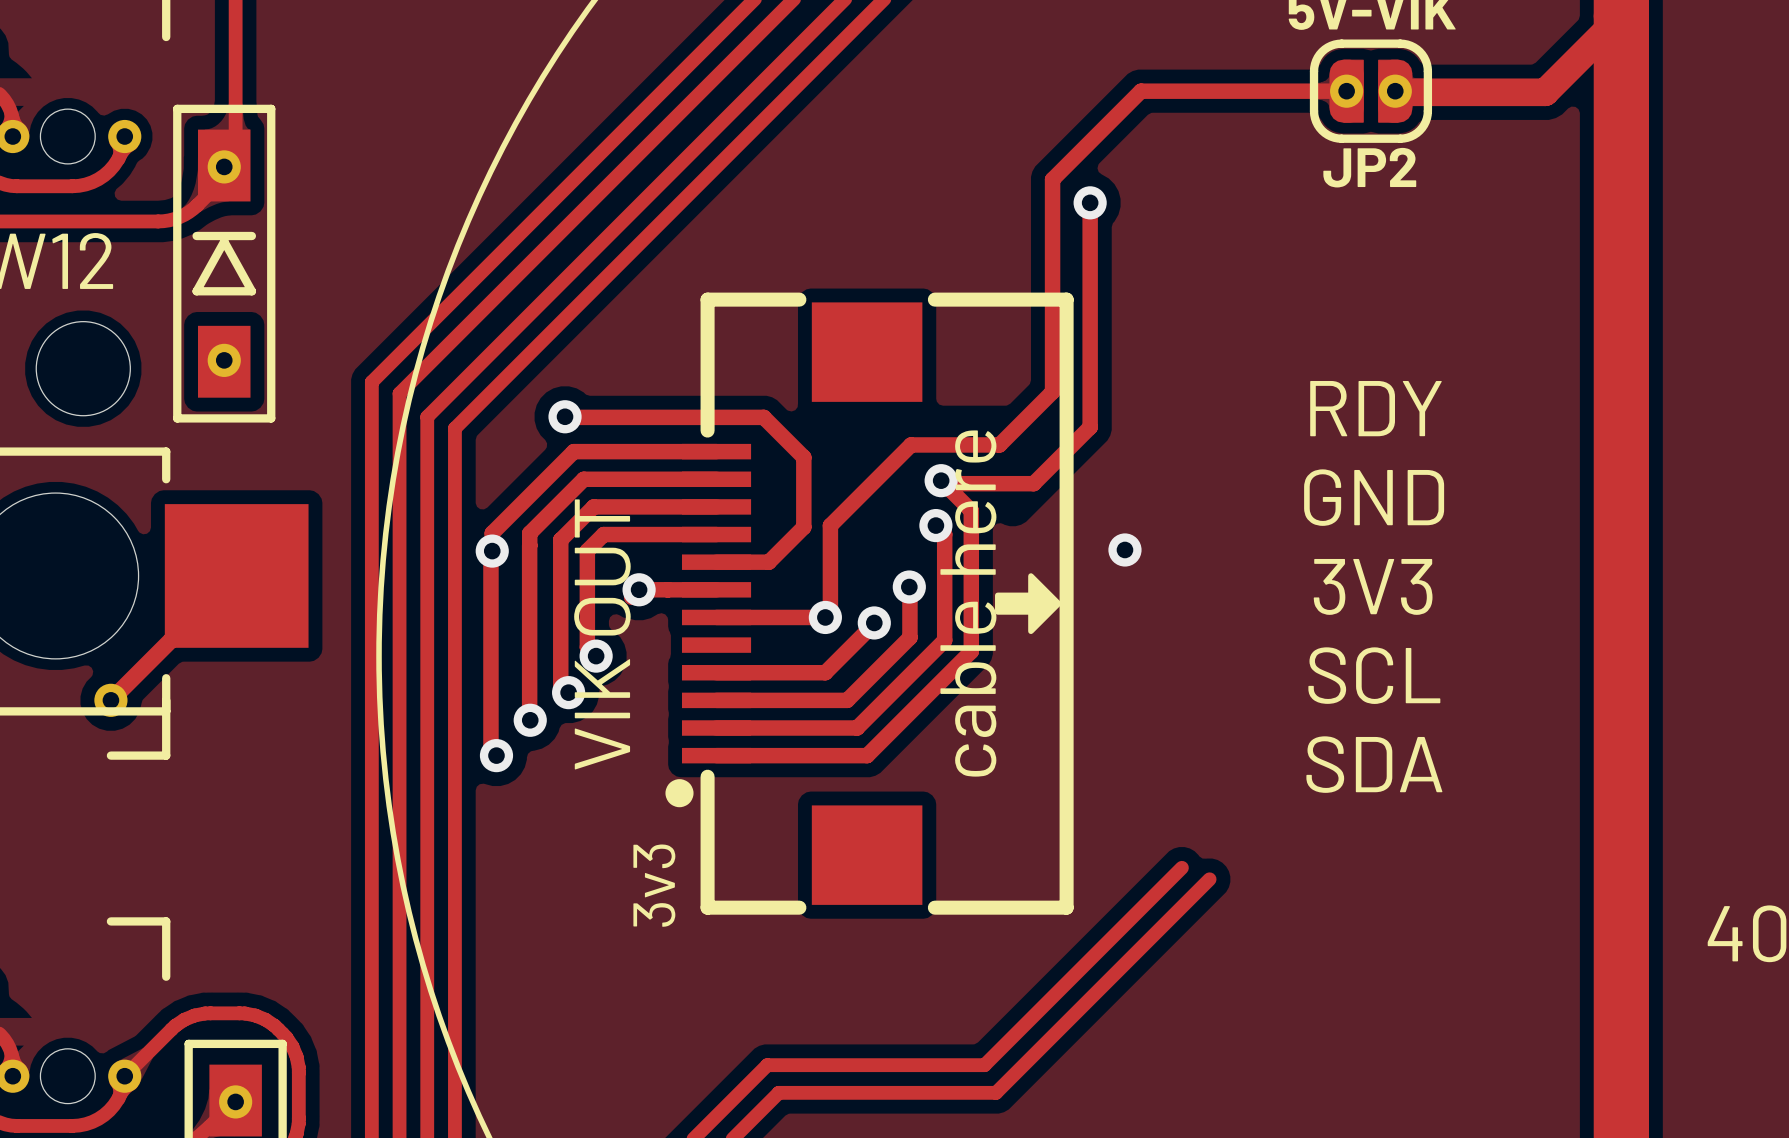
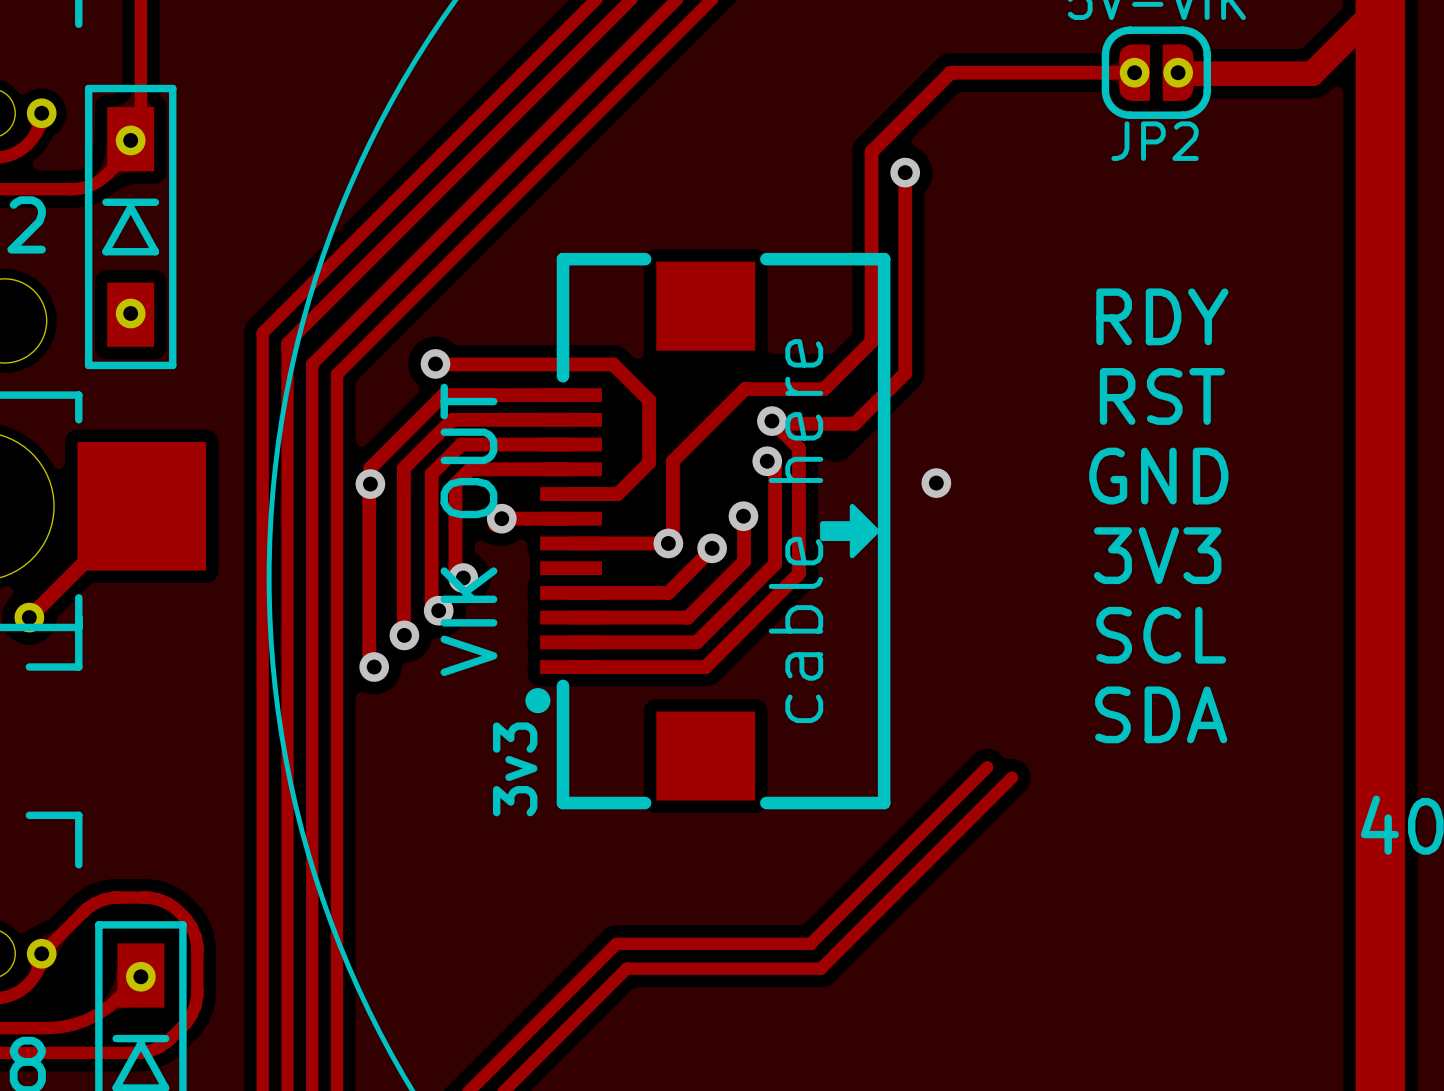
text position: RDY (1376, 408) -> RDY (1162, 316)
text: none -> RST (1162, 396)
text position: GND (1374, 497) -> GND (1158, 476)
text position: 3V3 (1373, 586) -> 3V3 (1157, 555)
text position: SCL (1374, 675) -> SCL (1161, 635)
text position: SDA (1374, 764) -> SDA (1161, 714)

